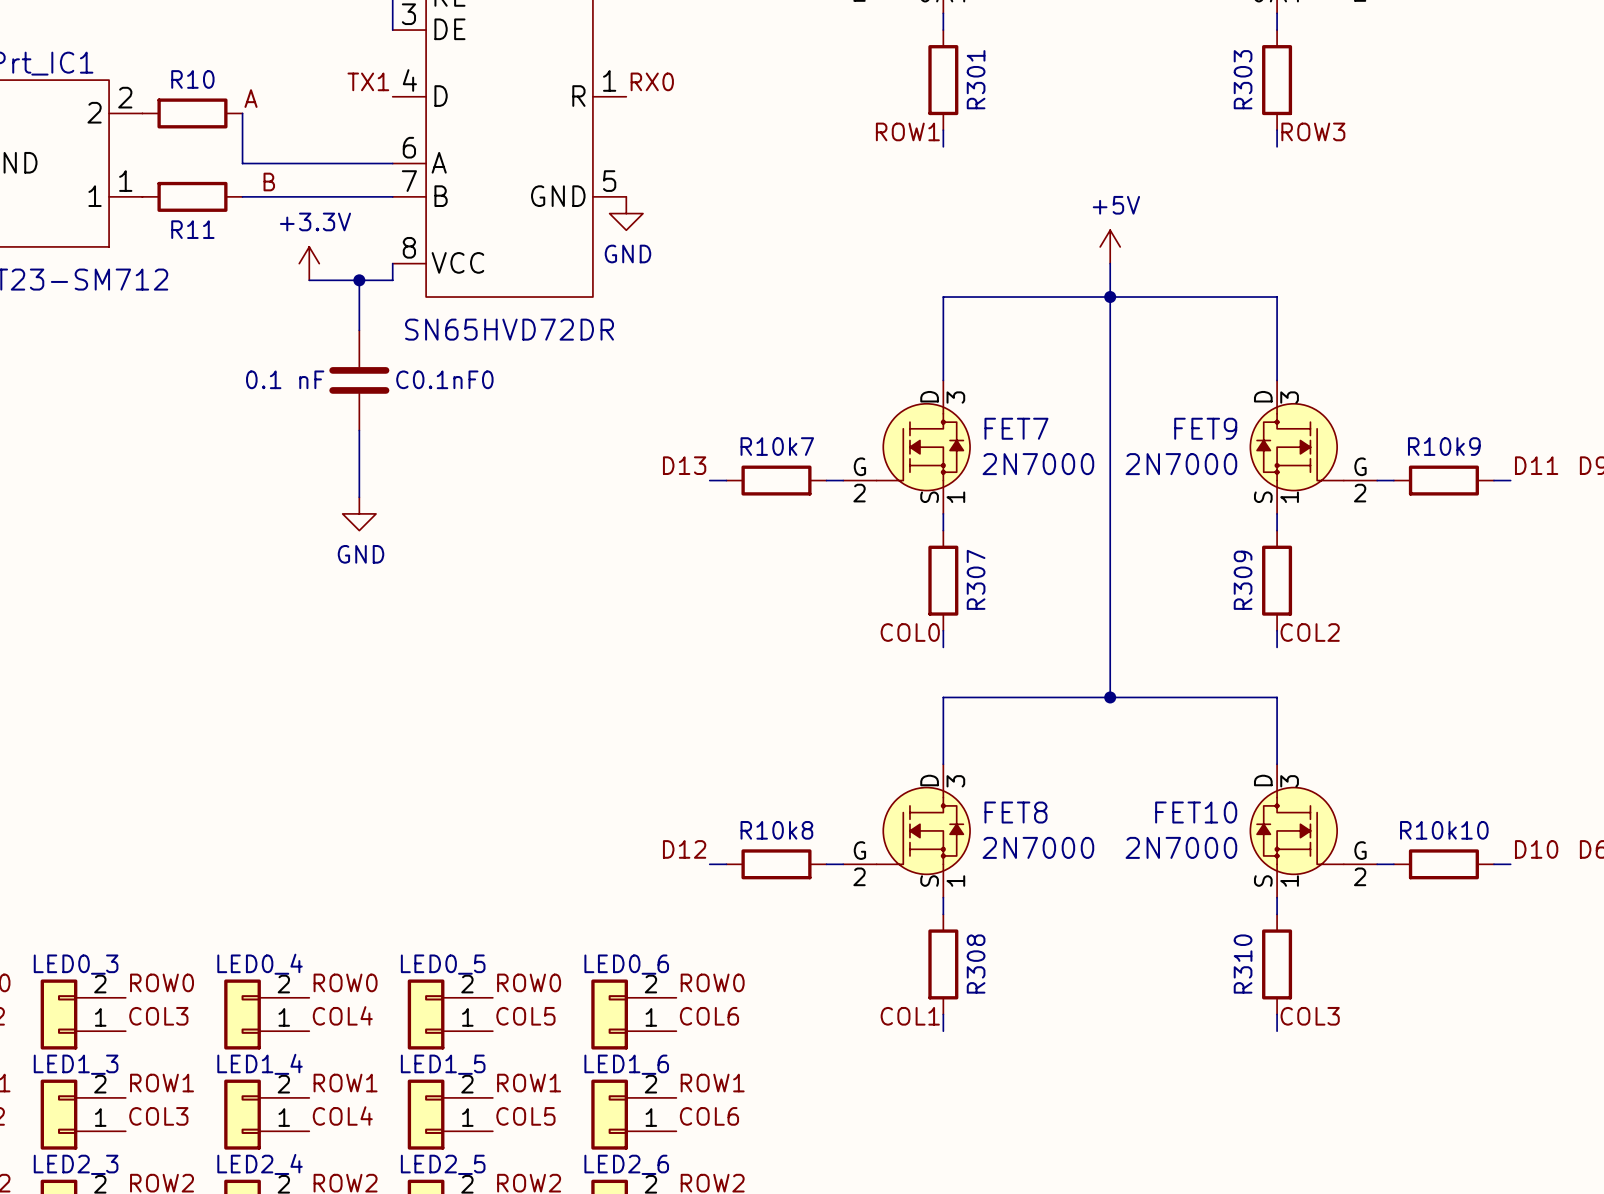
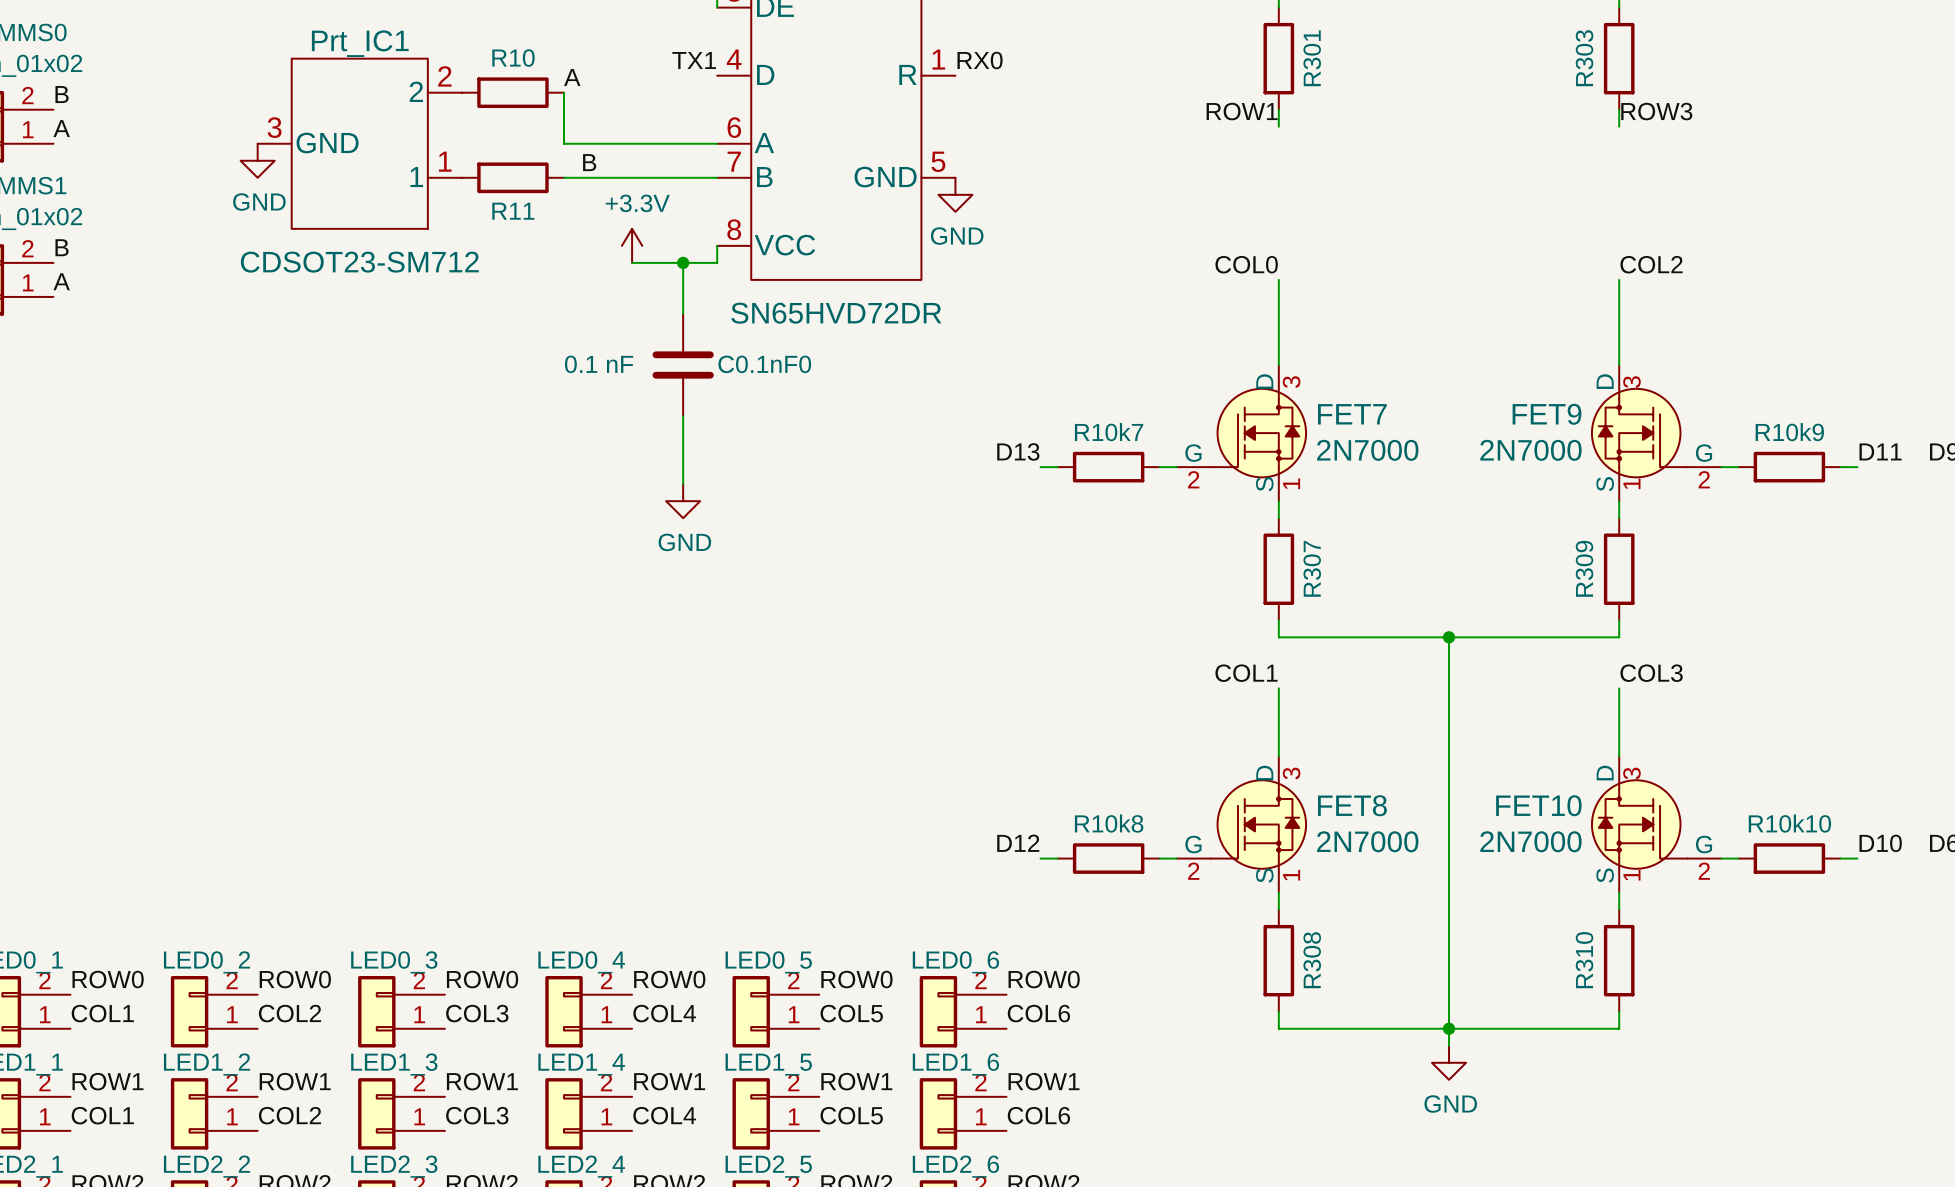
power symbol: +5V (1110, 246) -> none
wire: (1110, 263) (1110, 647) -> none
label: none -> COL0 (1246, 264)
label: none -> COL2 (1651, 264)
wire: (943, 297) (1277, 297) -> none
junction: (1110, 297) -> none
label: COL0 (910, 632) -> none
label: COL2 (1310, 632) -> none
label: none -> COL1 (1246, 673)
label: none -> COL3 (1651, 673)
wire: (943, 697) (1277, 697) -> (1278, 637) (1619, 637)
wire: none -> (1449, 688) (1449, 1045)
junction position: (1110, 697) -> (1449, 637)
label: COL1 (910, 1016) -> none
label: COL3 (1310, 1016) -> none
wire: none -> (1278, 1028) (1619, 1028)
junction: none -> (1449, 1028)
power symbol: none -> GND (1449, 1062)

